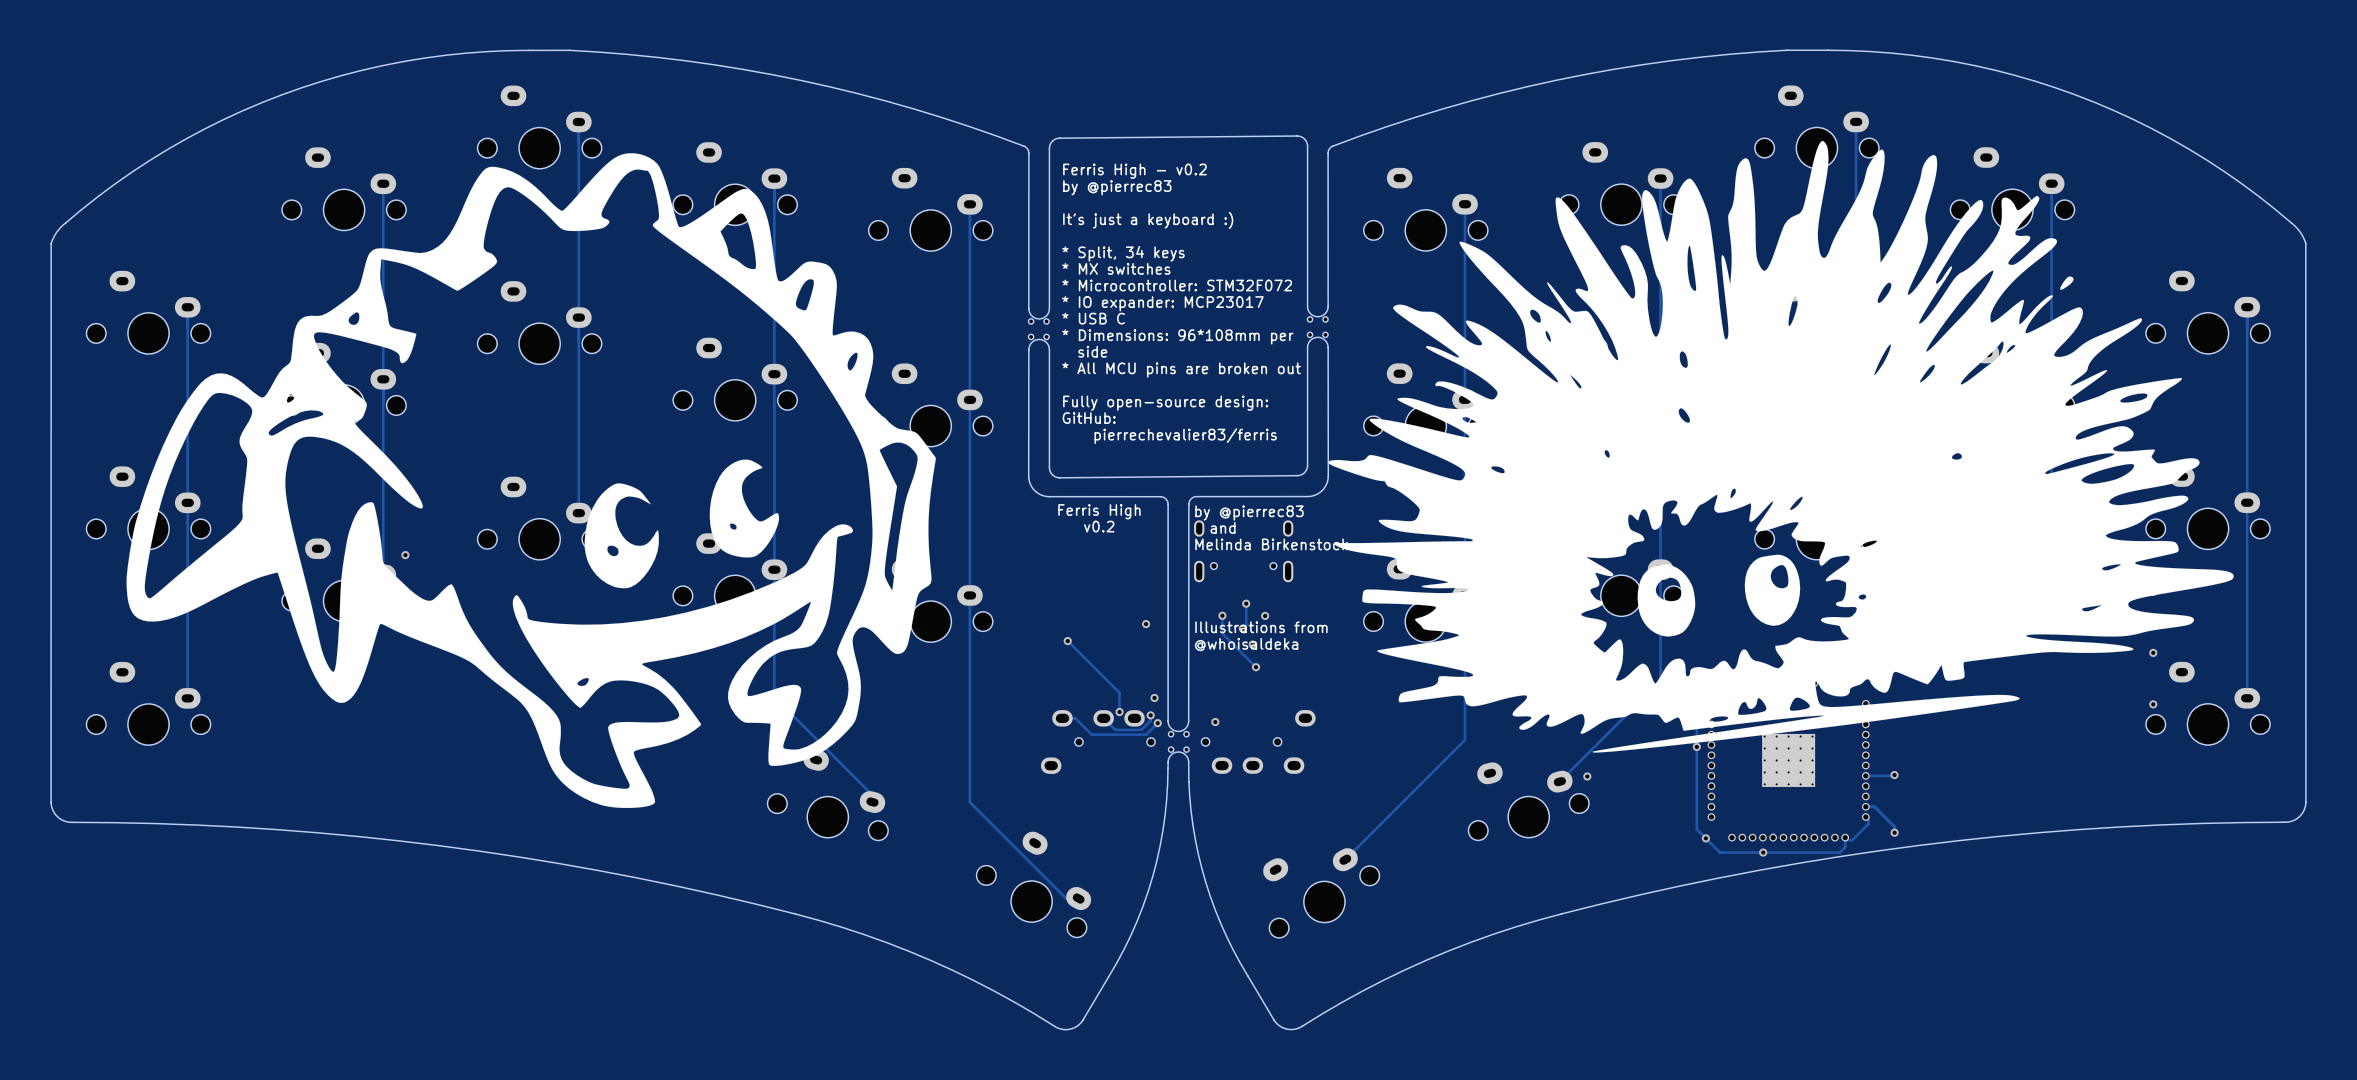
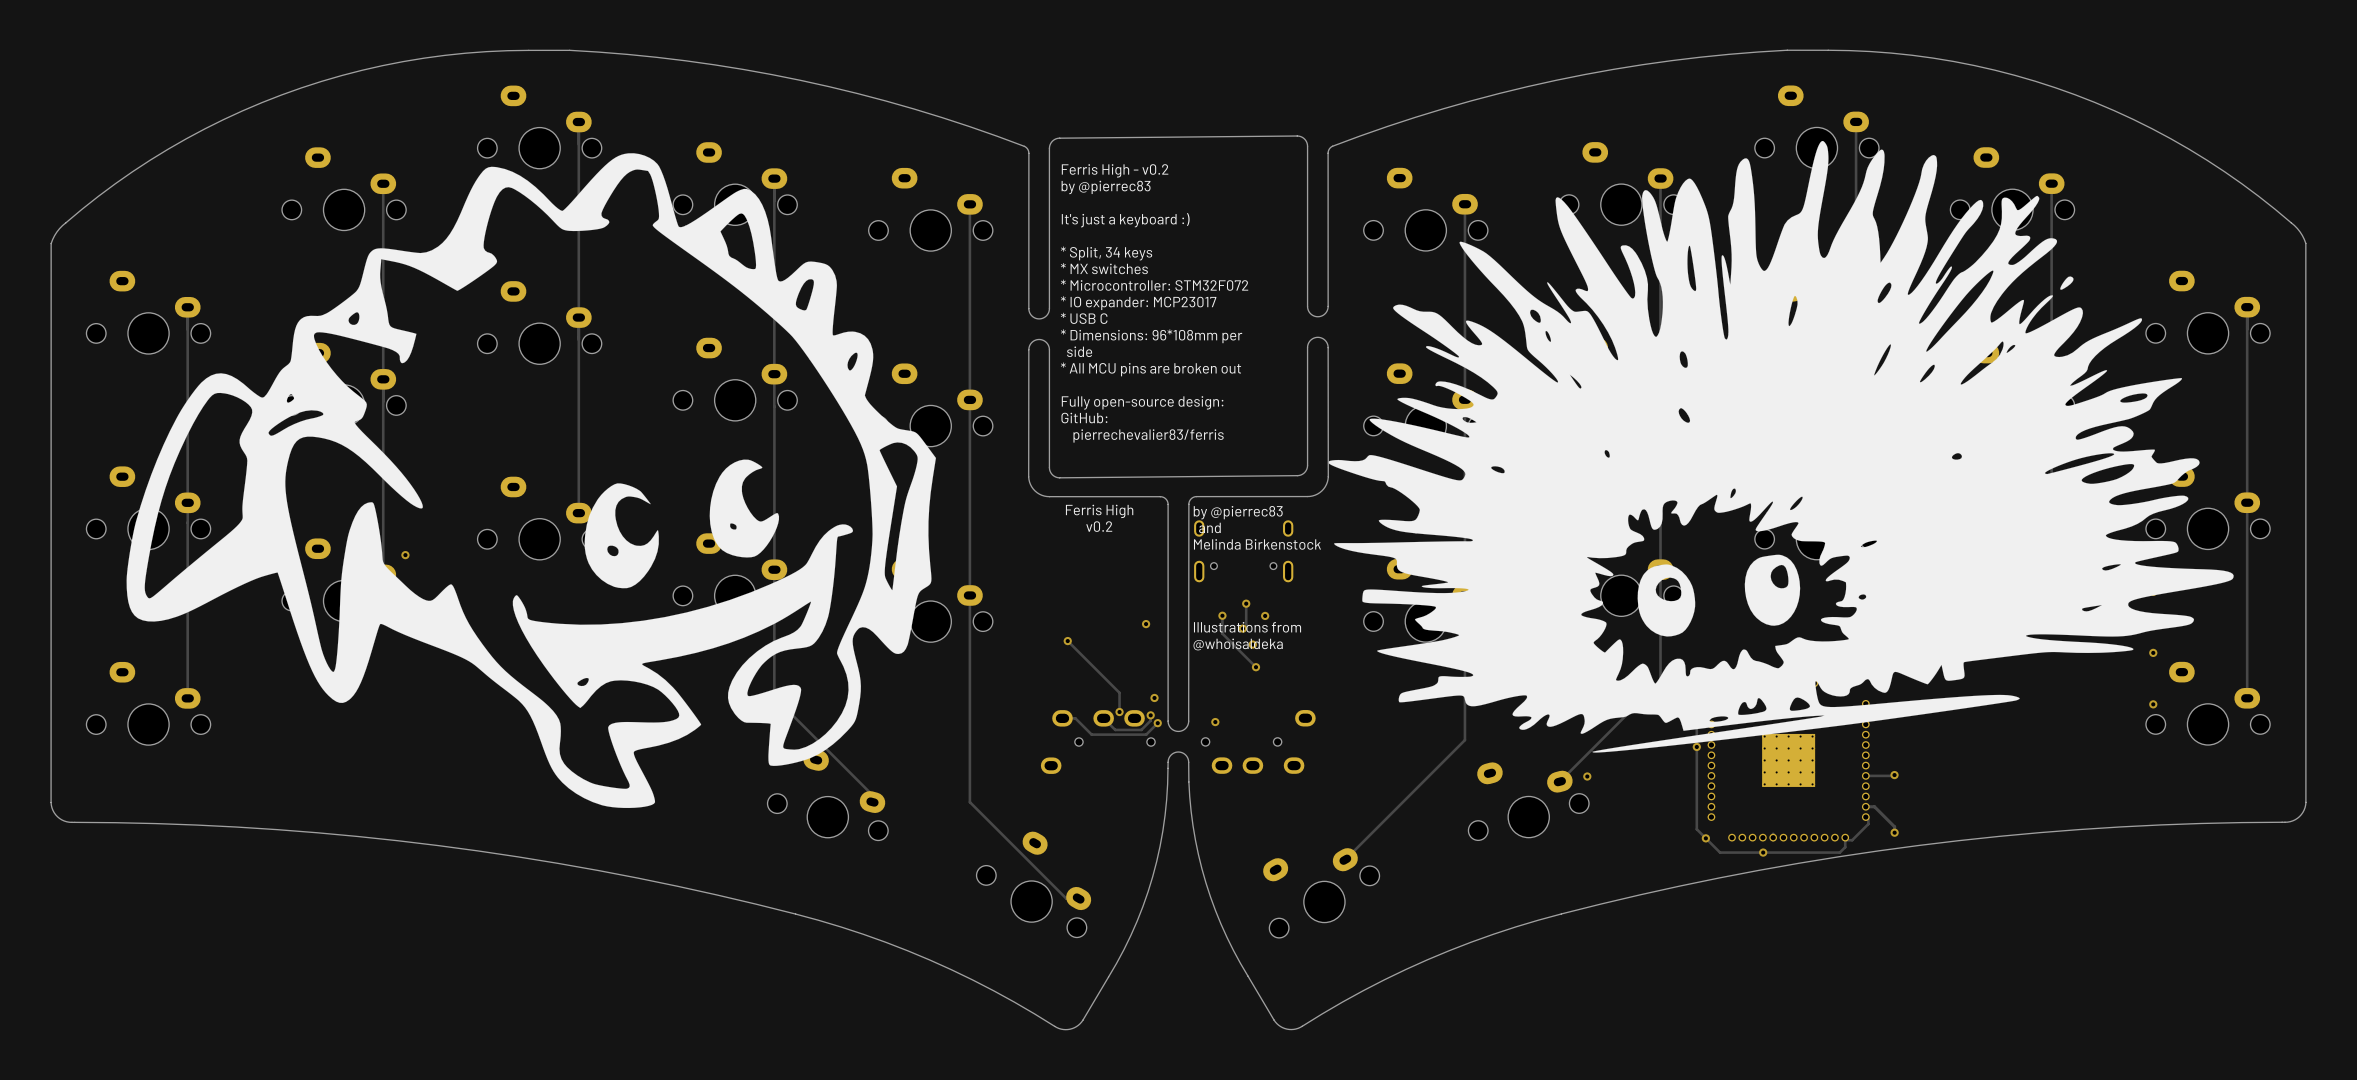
part: (1317, 327) -> none
part: (1038, 329) -> none
part: (1178, 741) -> none

